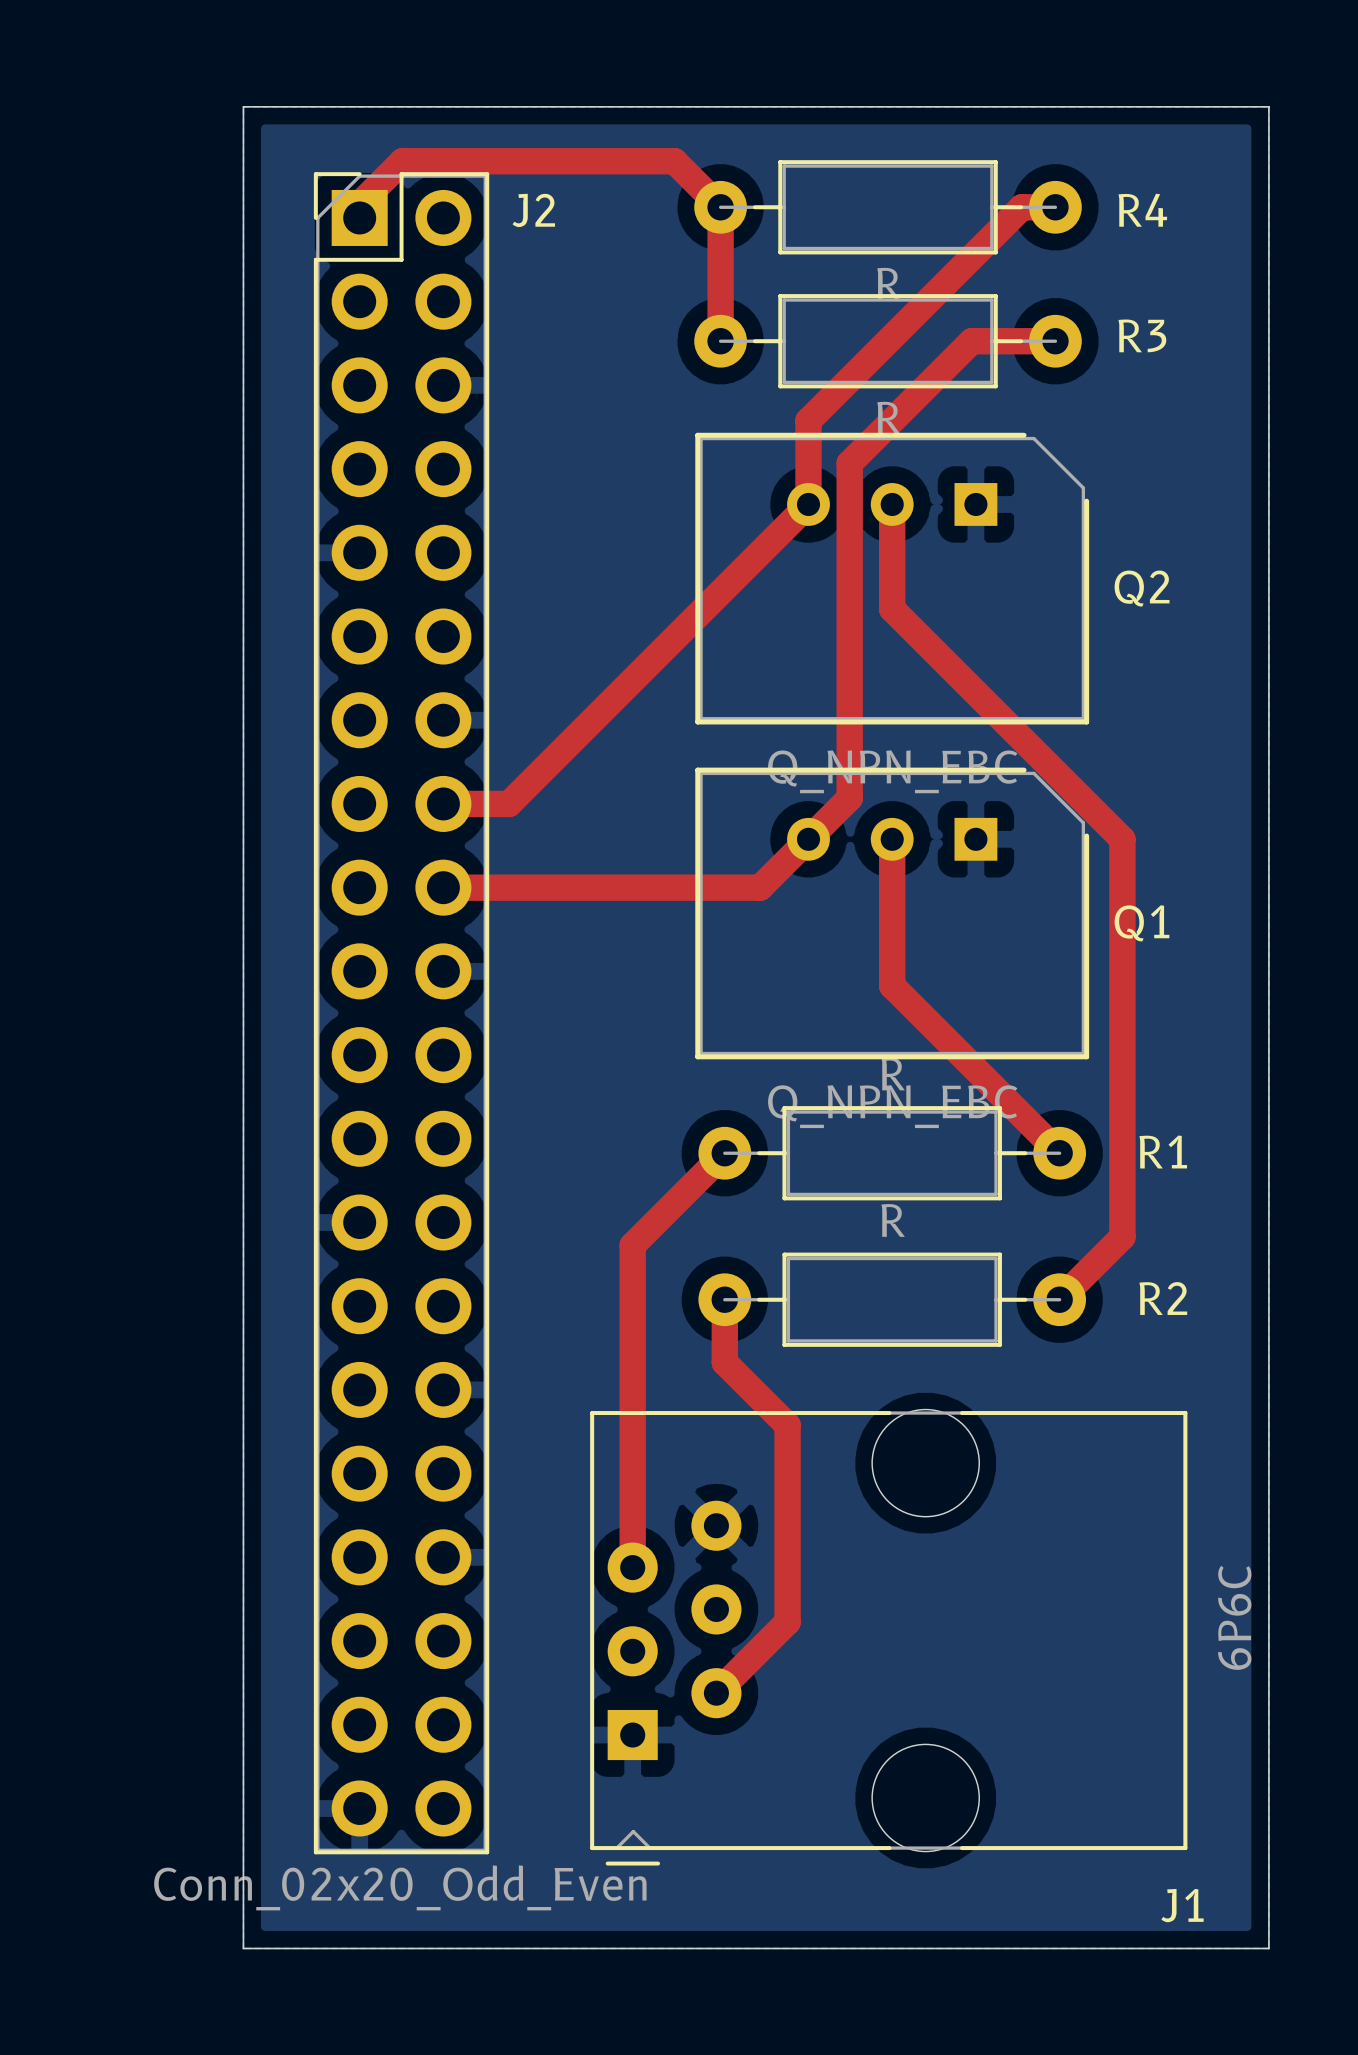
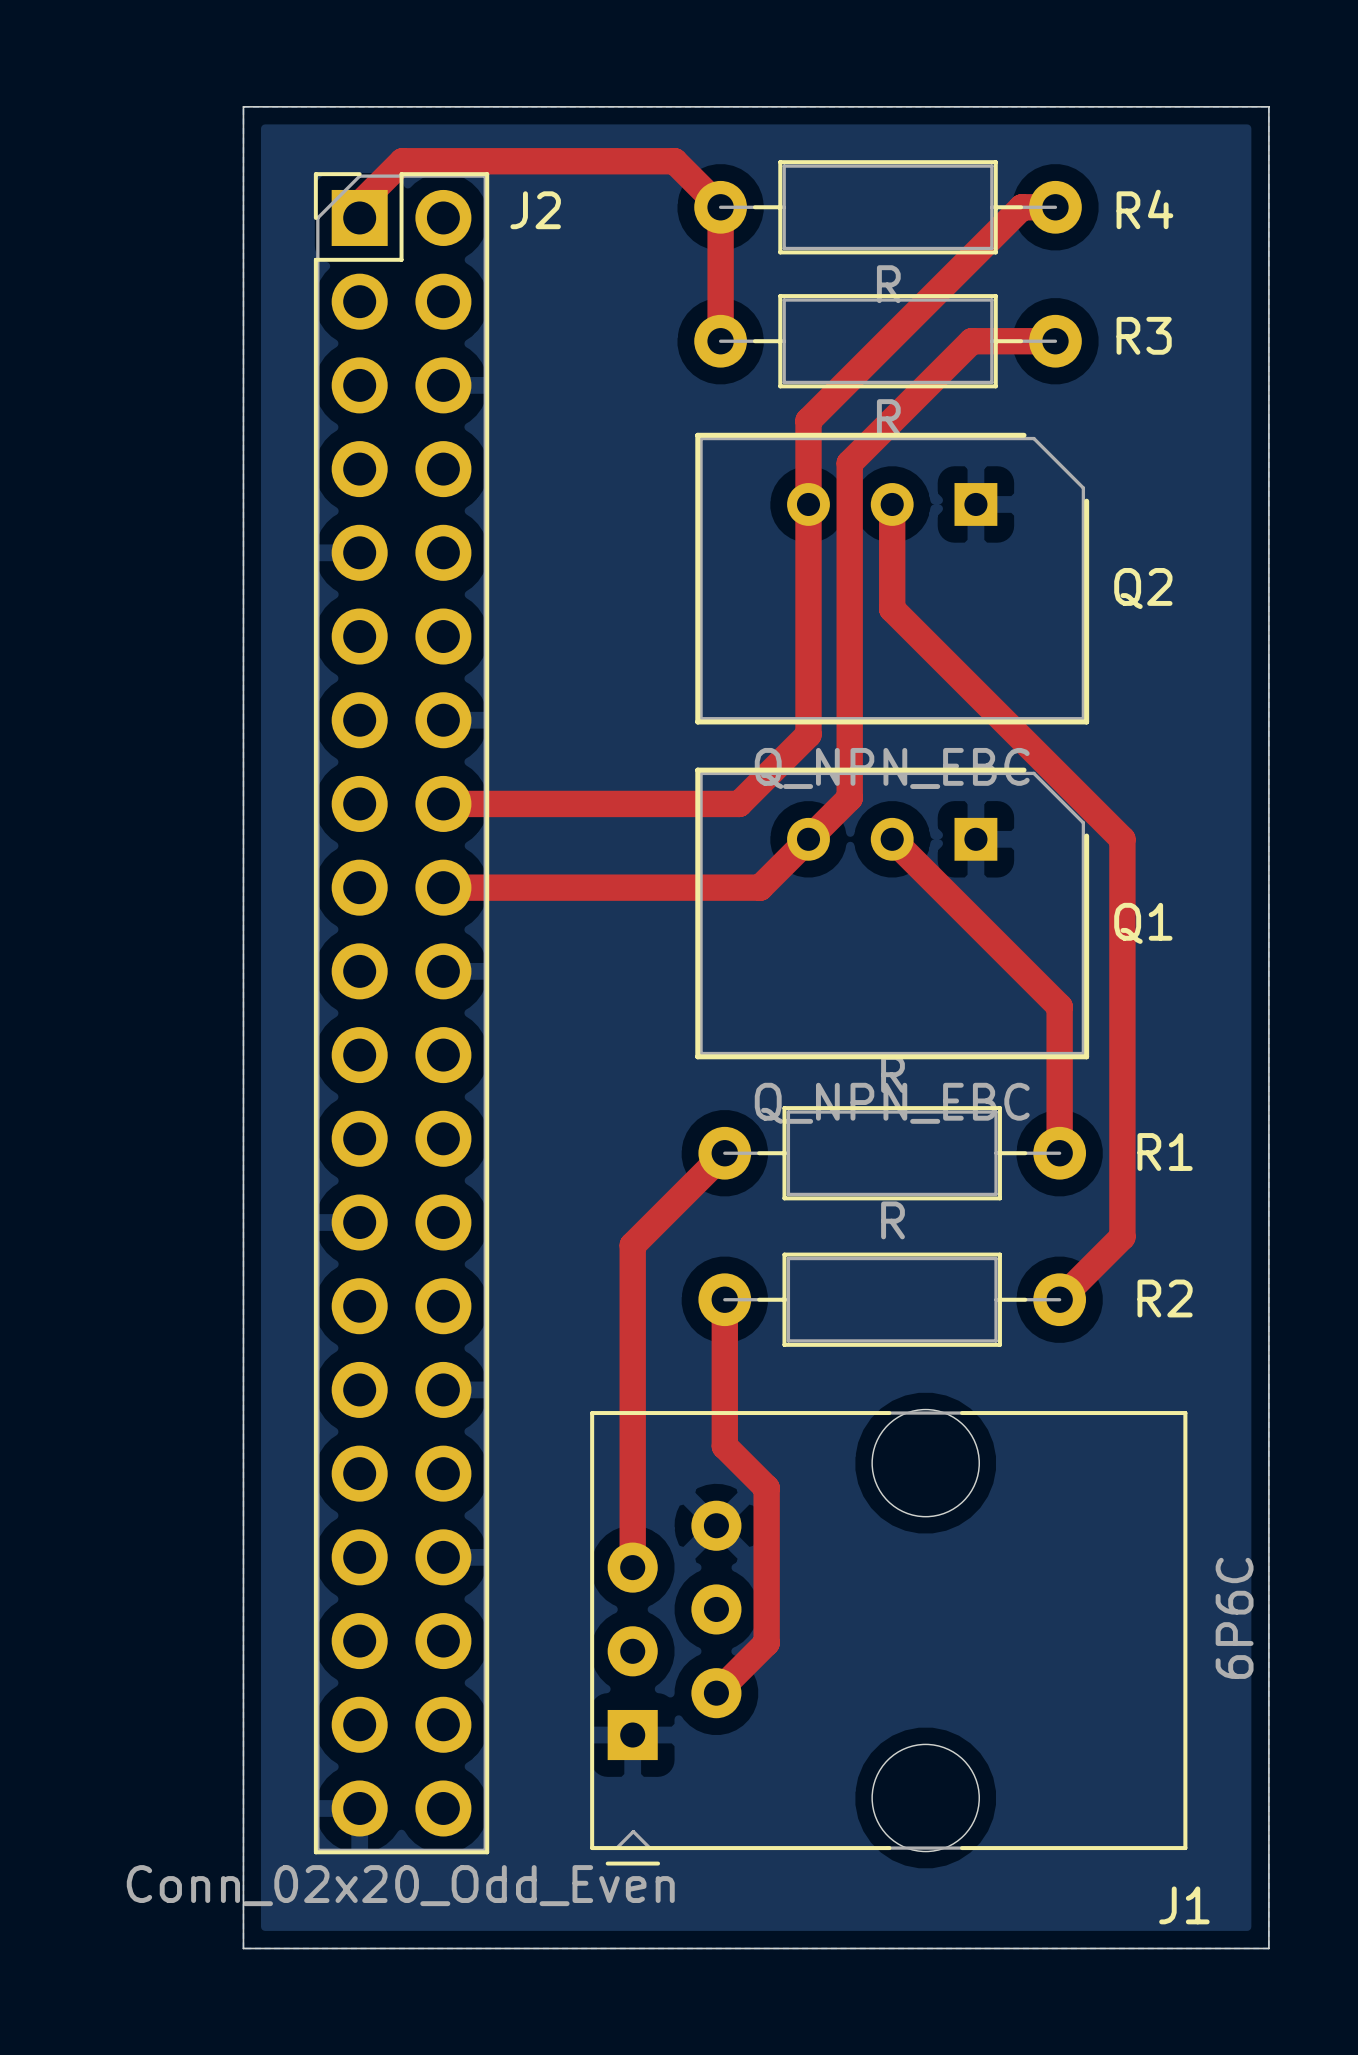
top track: (808, 504) (509, 803) -> (808, 504) (808, 734) (739, 803) (509, 803)
top track: (892, 839) (892, 985) (1059, 1153) -> (892, 839) (1059, 1006) (1059, 1153)
top track: (724, 1362) (787, 1425) (787, 1622) (766, 1642) -> (724, 1362) (724, 1446) (766, 1488) (766, 1642)

